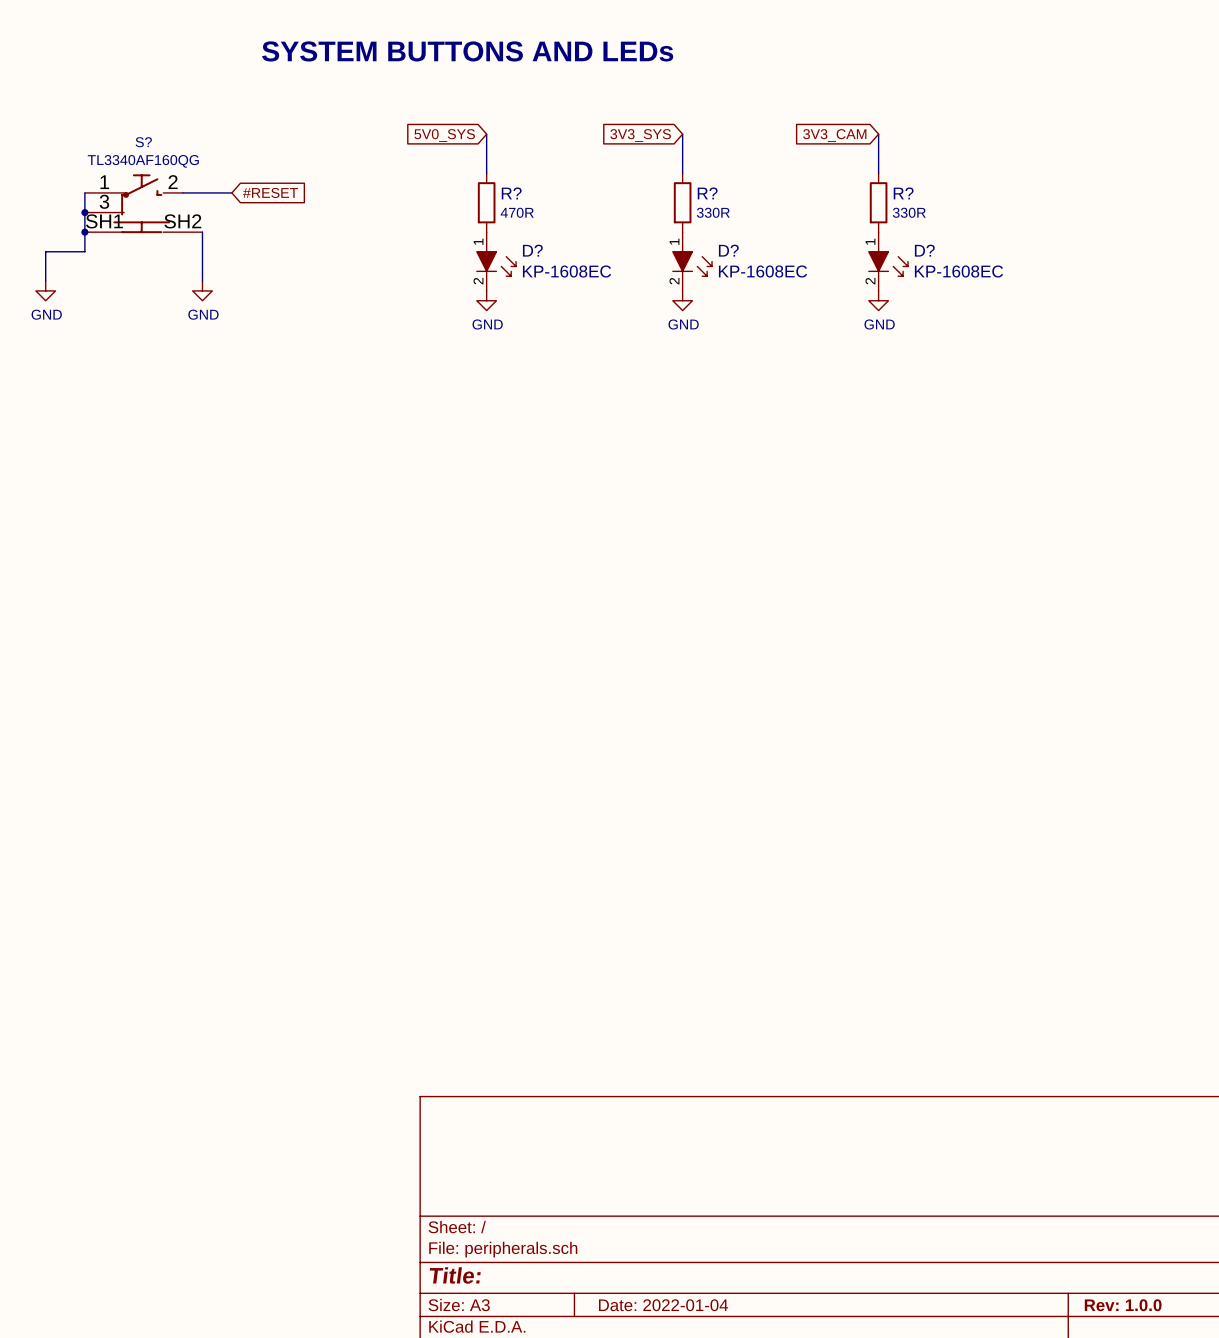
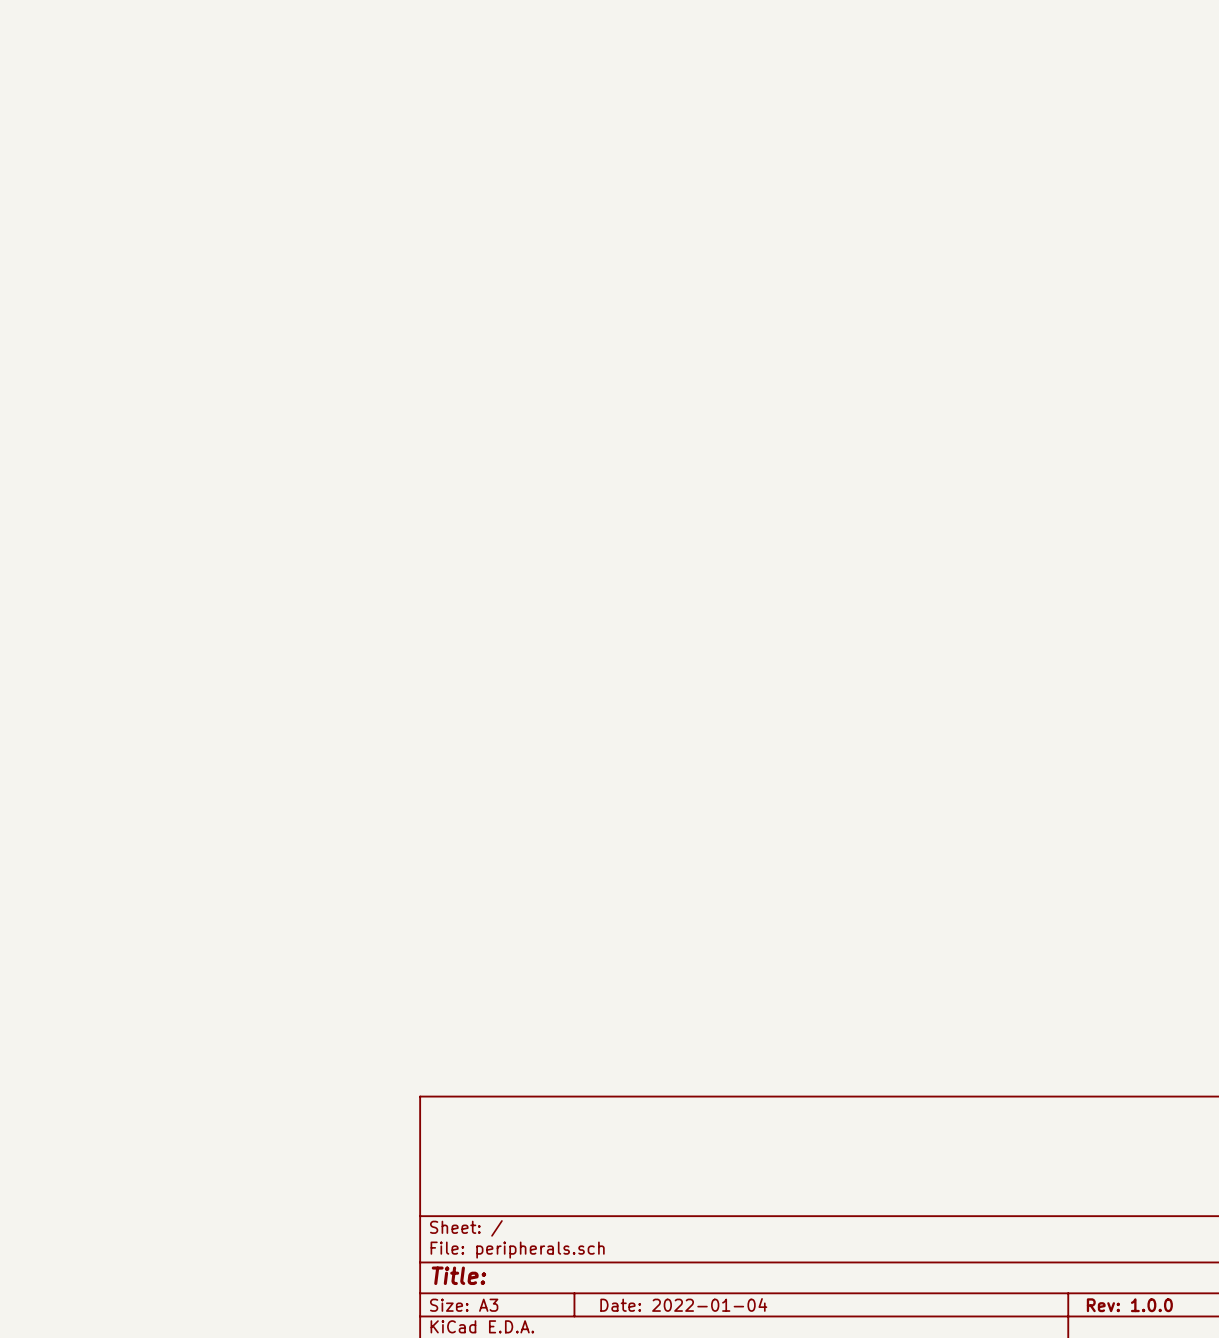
text: SYSTEM BUTTONS AND LEDs (467, 51) -> none
wire: (486, 134) (486, 173) -> none
wire: (682, 134) (682, 173) -> none
wire: (878, 134) (878, 173) -> none
global label: 5V0_SYS (444, 135) -> none
global label: 3V3_SYS (640, 135) -> none
global label: 3V3_CAM (834, 135) -> none
wire: (84, 192) (84, 251) (45, 251) (45, 281) -> none
wire: (182, 192) (231, 192) -> none
global label: #RESET (270, 192) -> none
R?: (486, 202) -> none
R?: (682, 202) -> none
R?: (878, 202) -> none
S?: TL3340AF160QG (143, 203) -> none
junction: (84, 212) -> none
junction: (84, 232) -> none
wire: (202, 232) (202, 281) -> none
D?: KP-1608EC (496, 261) -> none
D?: KP-1608EC (692, 261) -> none
D?: KP-1608EC (888, 261) -> none
power symbol: GND (45, 290) -> none
power symbol: GND (202, 290) -> none
power symbol: GND (486, 300) -> none
power symbol: GND (682, 300) -> none
power symbol: GND (878, 300) -> none

